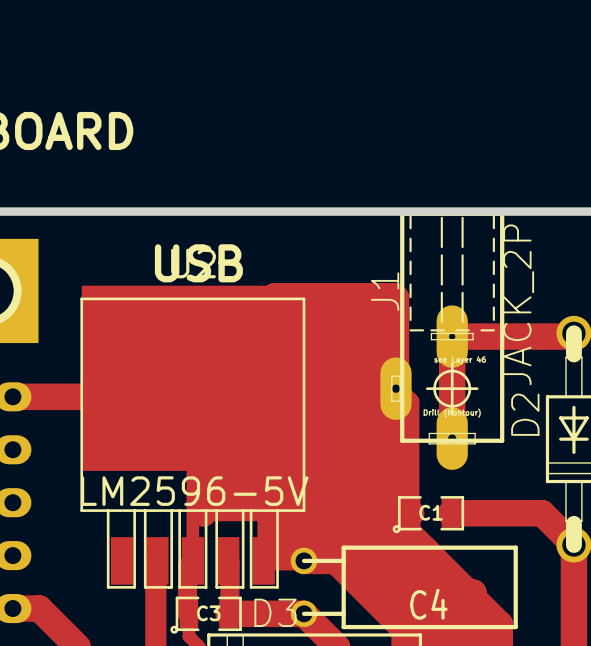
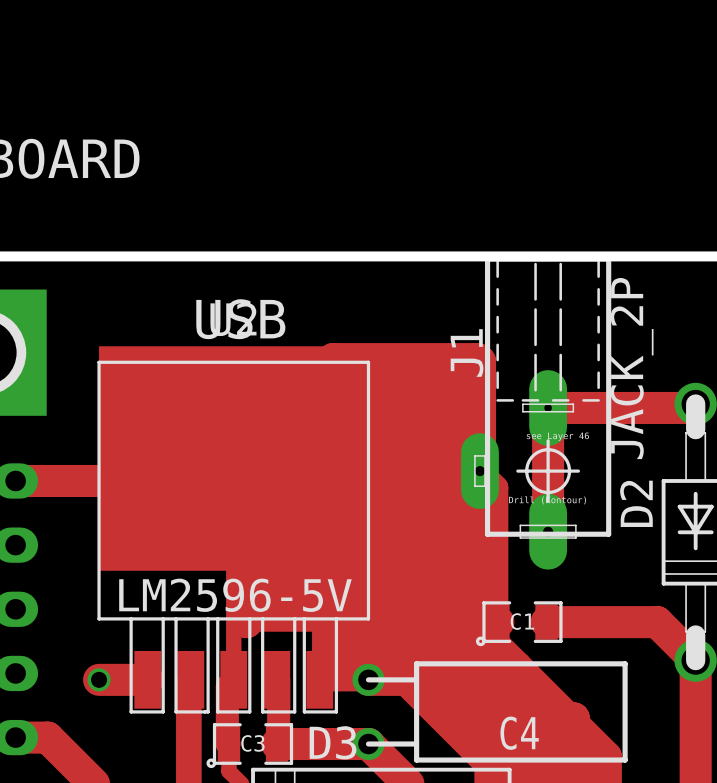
track: none -> (99, 679) (147, 679)
via: none -> (99, 679)

